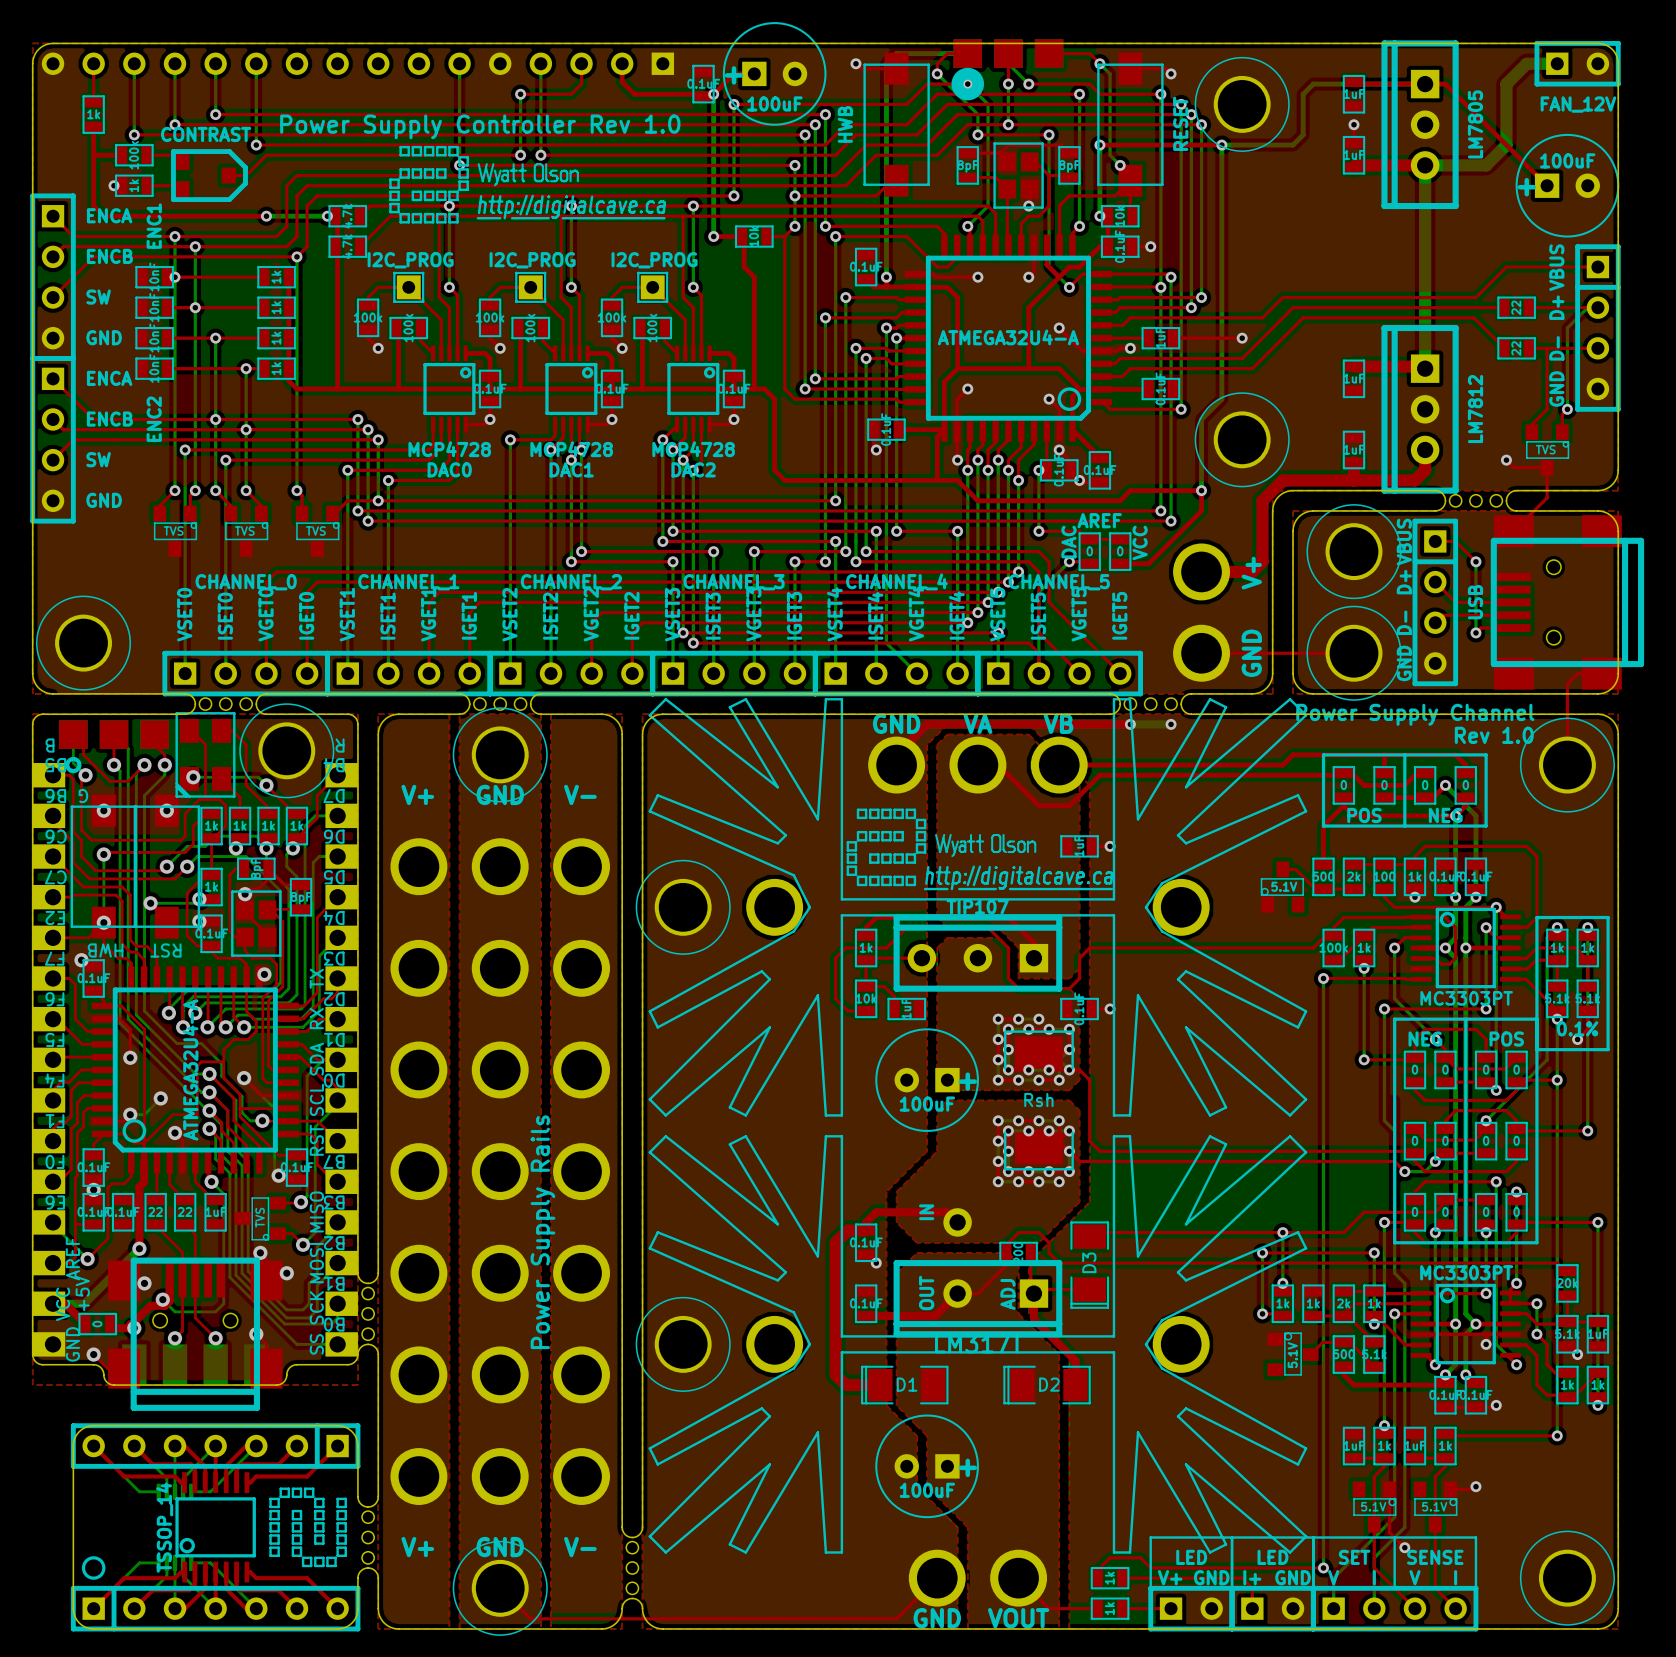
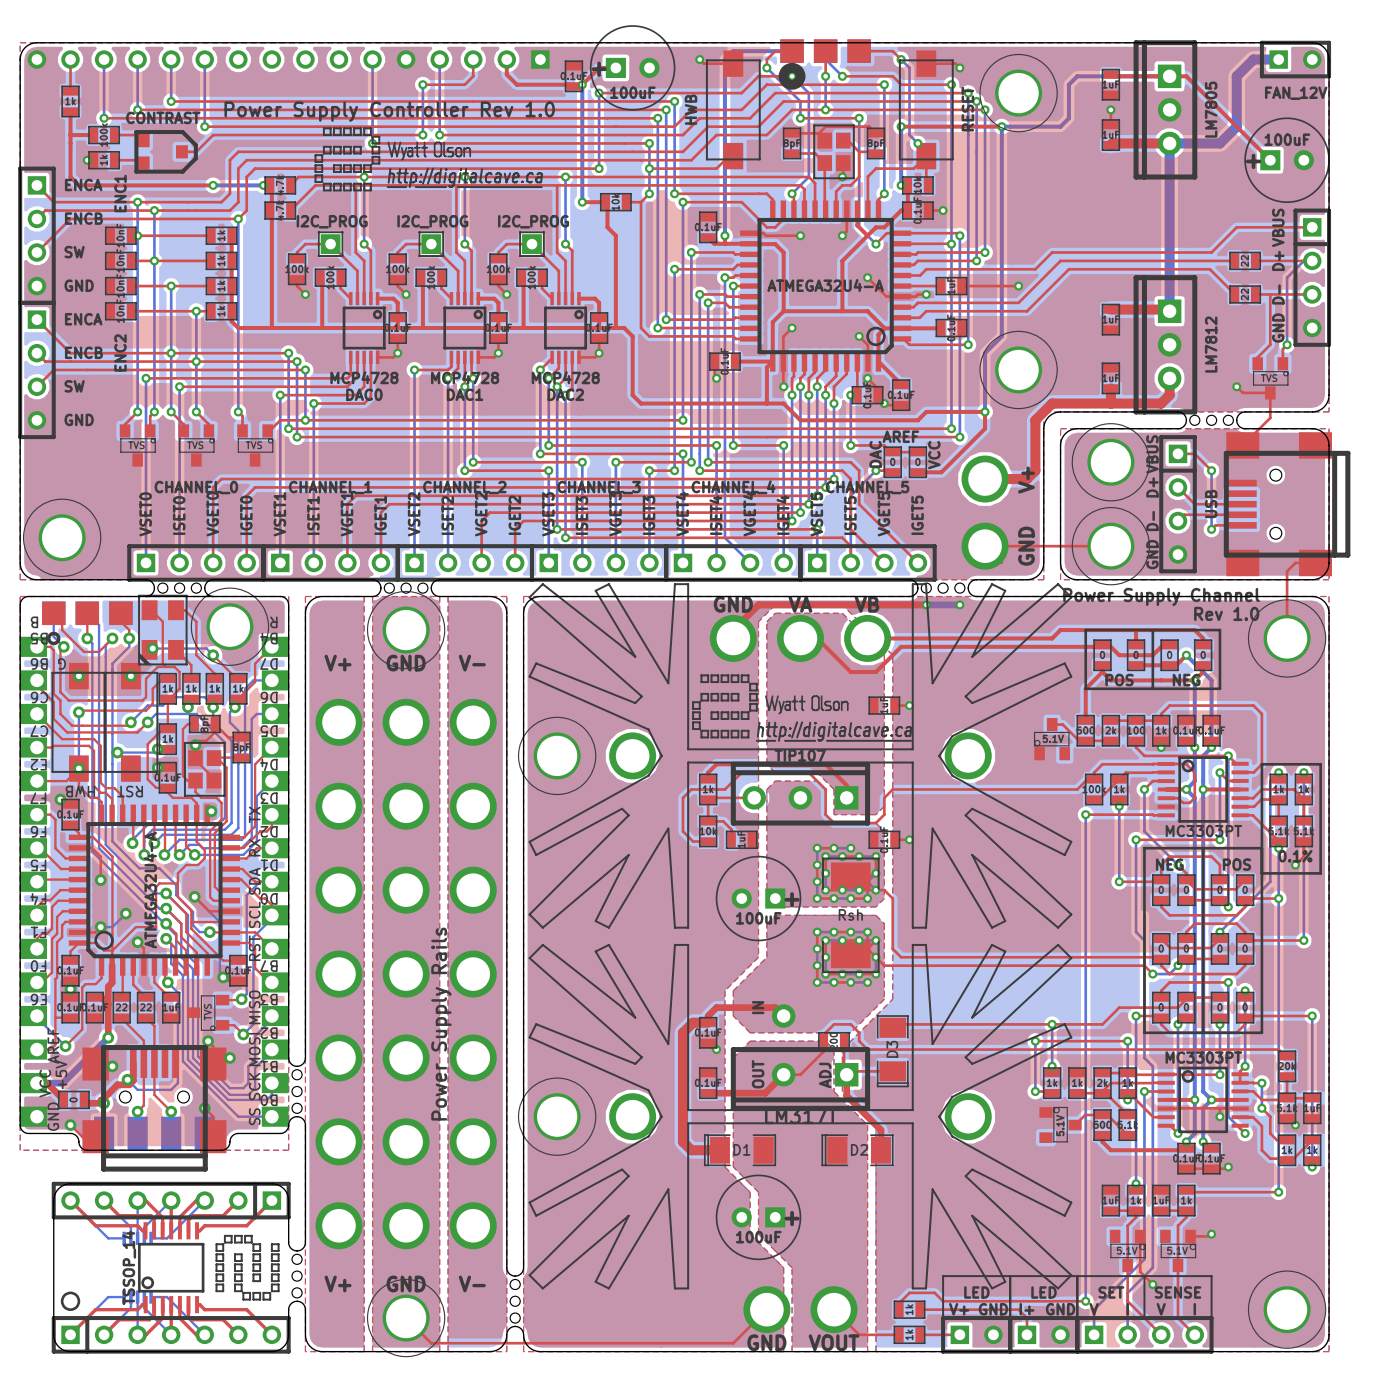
board edge: none -> (146, 596) (213, 596)

